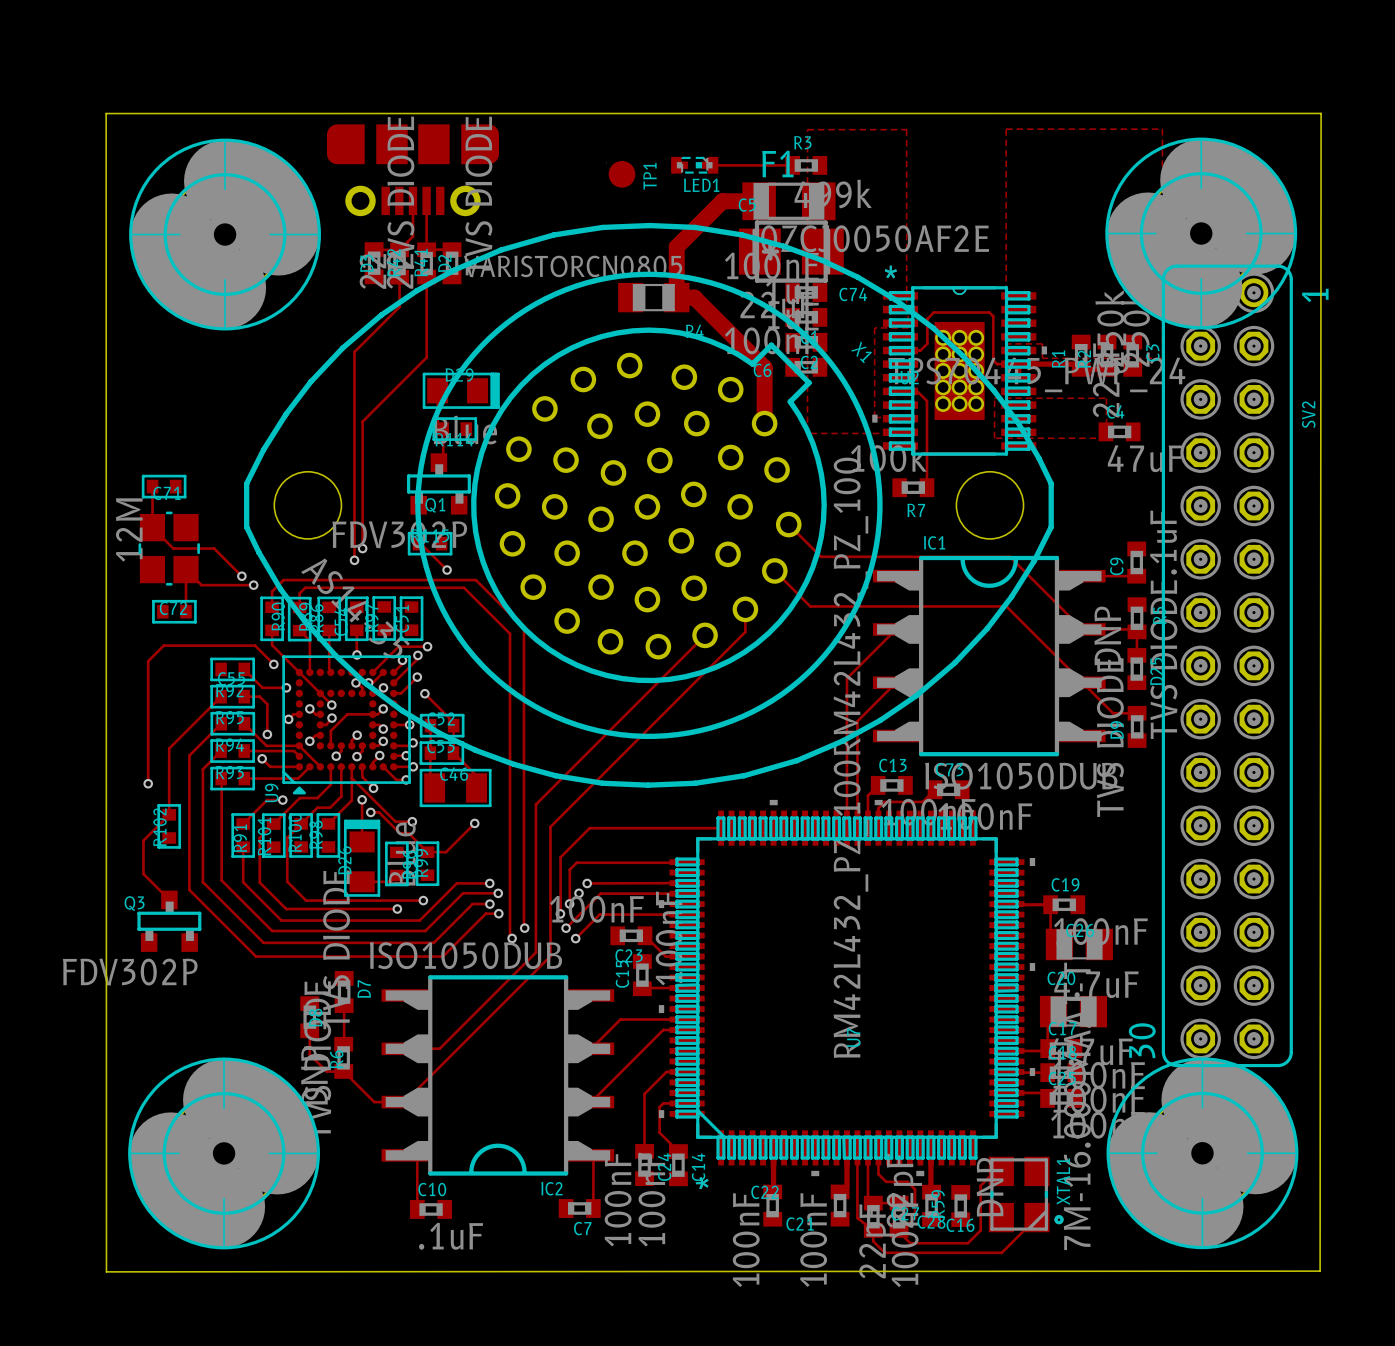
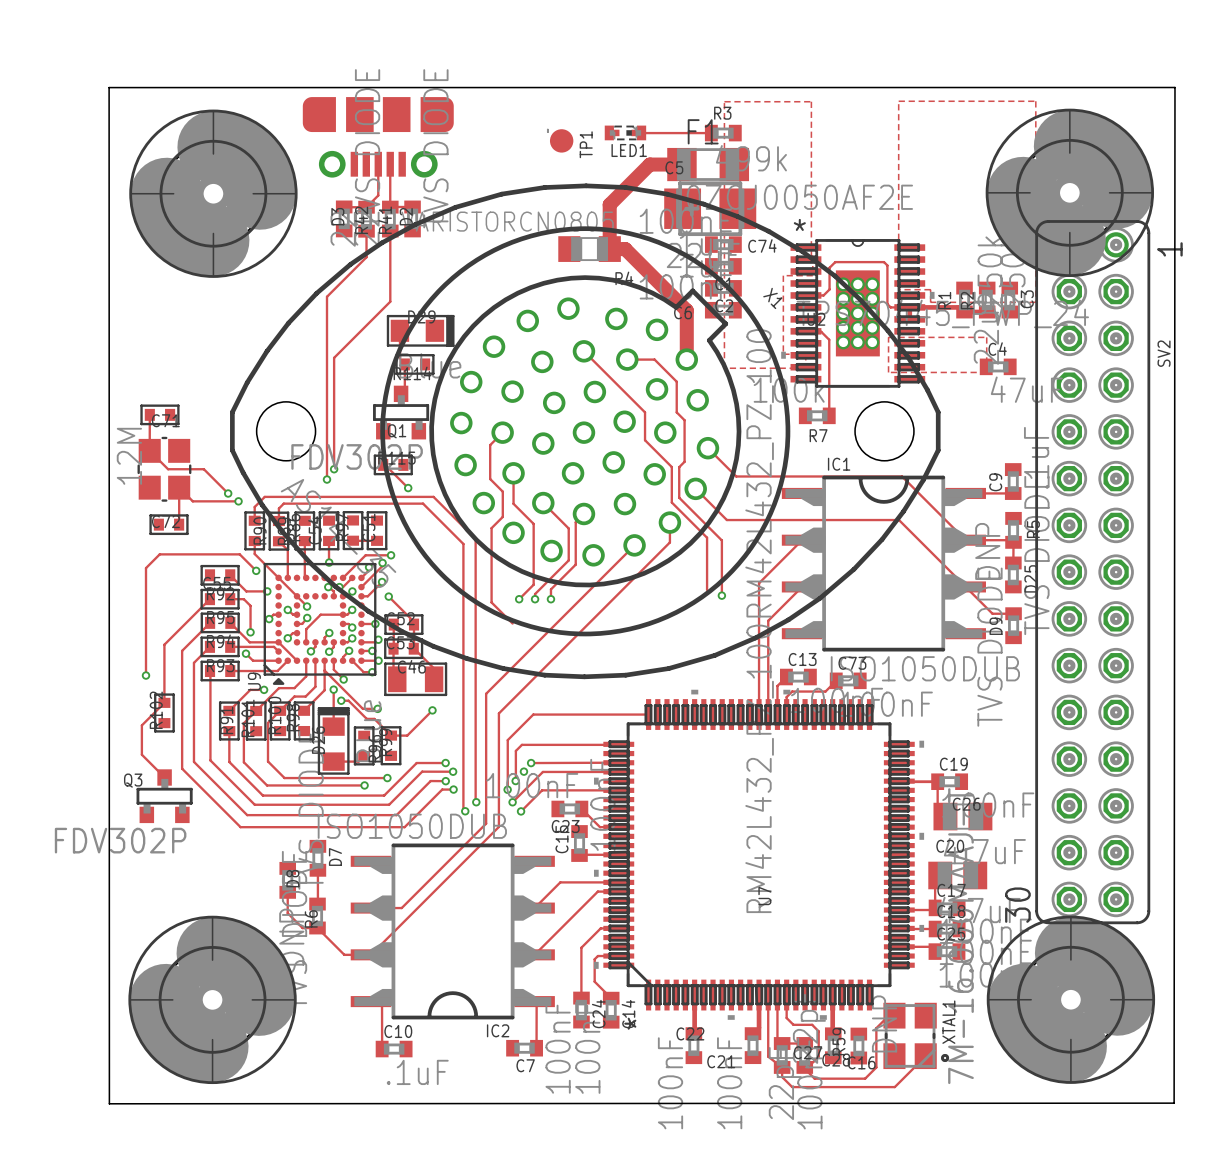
track: none -> (583, 351) (645, 412) (645, 440) (671, 467) (671, 502) (707, 537) (707, 589)
track: none -> (627, 359) (654, 359) (676, 381) (676, 412) (684, 420) (684, 461) (679, 467) (679, 497) (721, 540) (721, 595)
track: none -> (502, 432) (490, 445) (490, 479) (502, 491) (502, 516) (491, 528) (491, 602) (512, 623)
track: none -> (513, 473) (513, 503) (533, 523) (533, 584) (519, 599)
track: none -> (543, 503) (568, 528) (568, 560) (535, 594) (535, 599)
track: none -> (583, 513) (575, 522) (575, 564) (550, 589) (550, 599)
via: none -> (721, 595)
via: none -> (519, 599)
via: none -> (535, 599)
via: none -> (550, 599)

